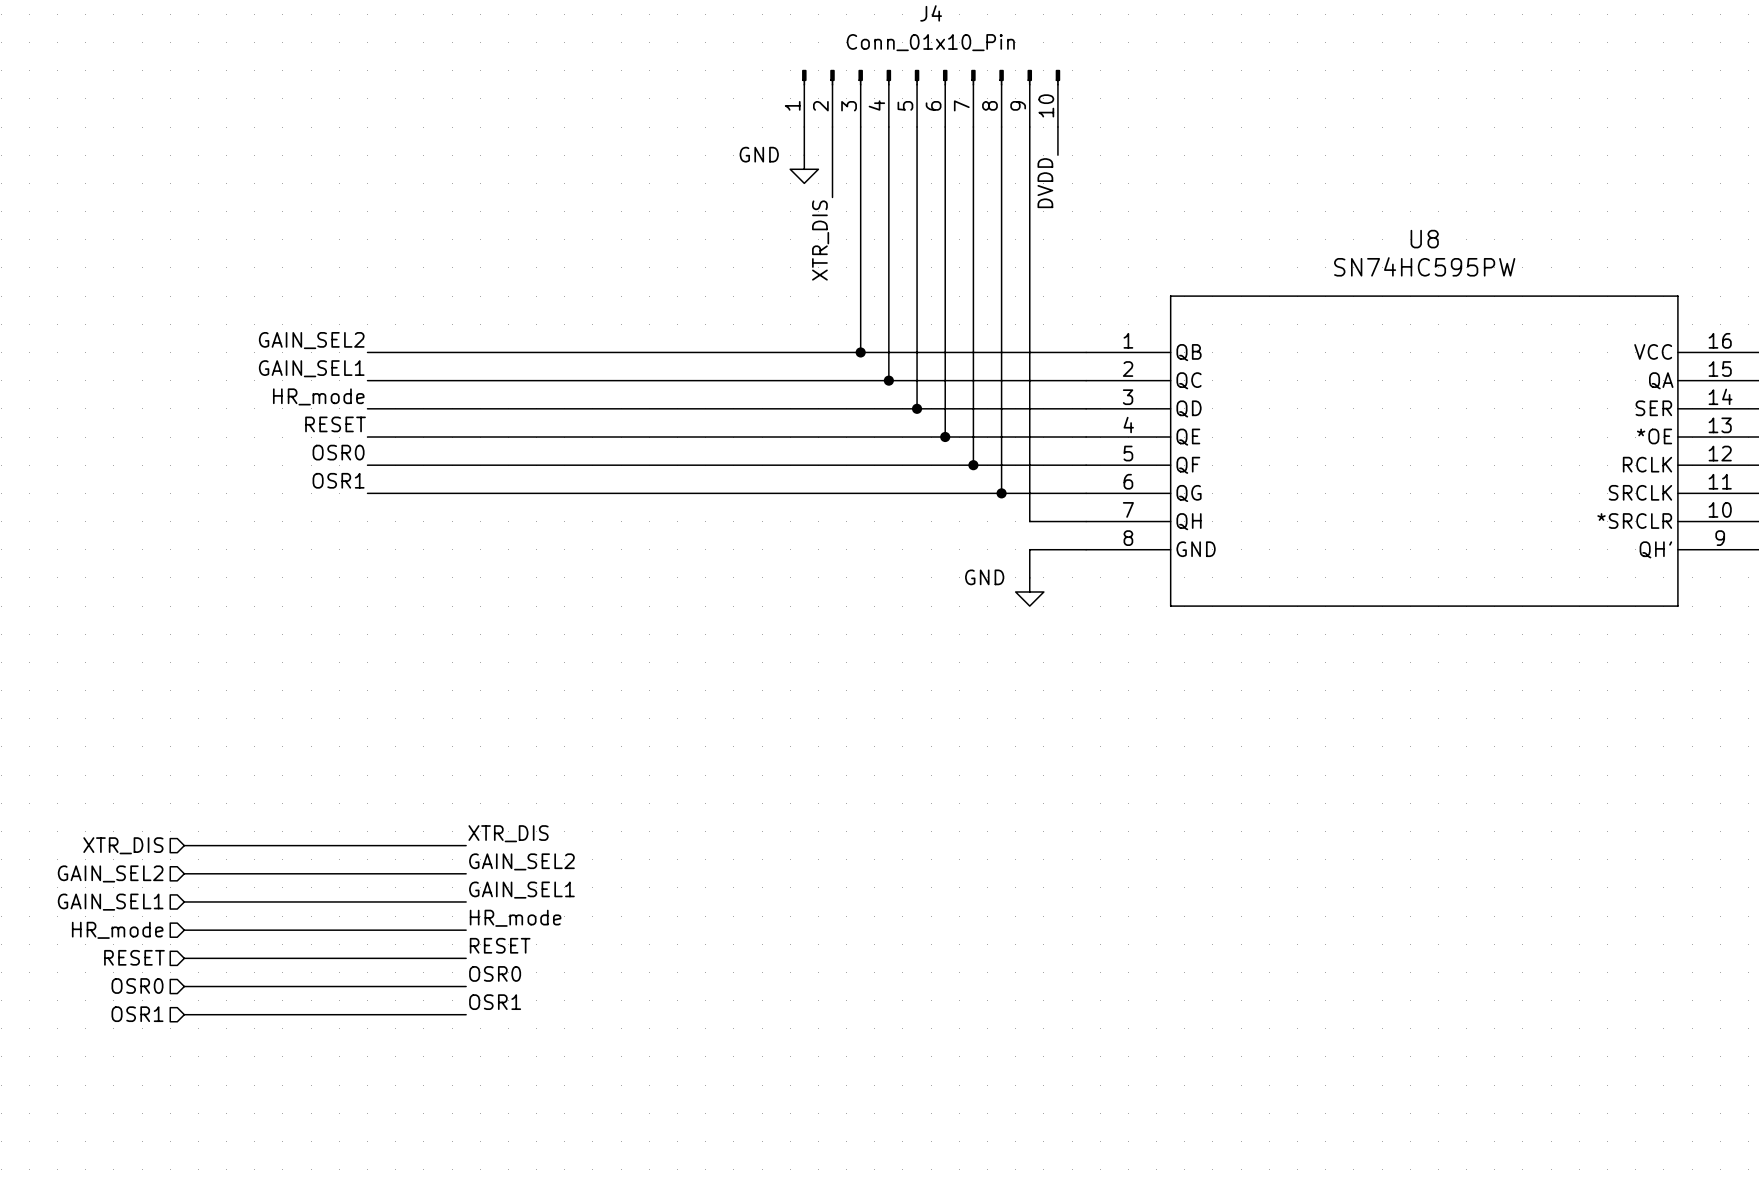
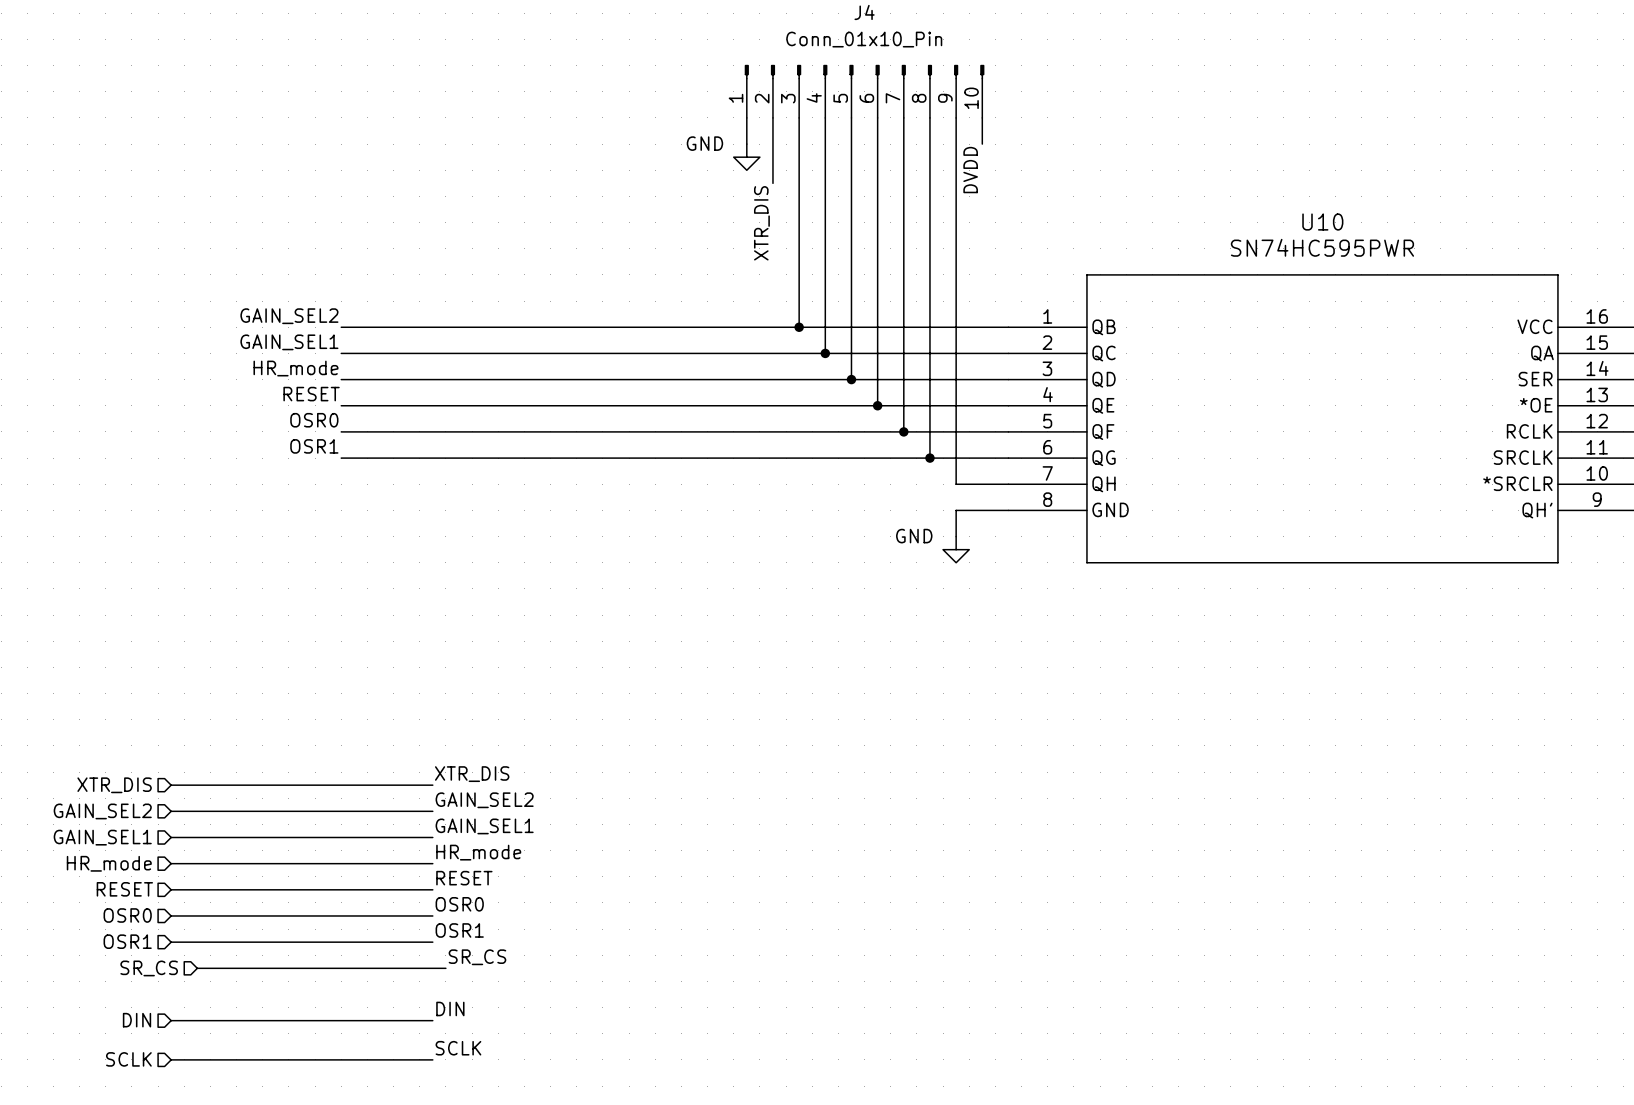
U8 name: U8 (1424, 239) -> U10 (1322, 222)
U8 value: SN74HC595PW (1424, 266) -> SN74HC595PWR (1322, 247)
label: none -> SR_CS (477, 957)
wire: none -> (197, 968) (445, 968)
hierarchical label: none -> SR_CS (149, 968)
label: none -> DIN (450, 1008)
hierarchical label: none -> DIN (137, 1020)
wire: none -> (171, 1020) (432, 1020)
label: none -> SCLK (458, 1048)
hierarchical label: none -> SCLK (128, 1059)
wire: none -> (171, 1059) (432, 1059)

